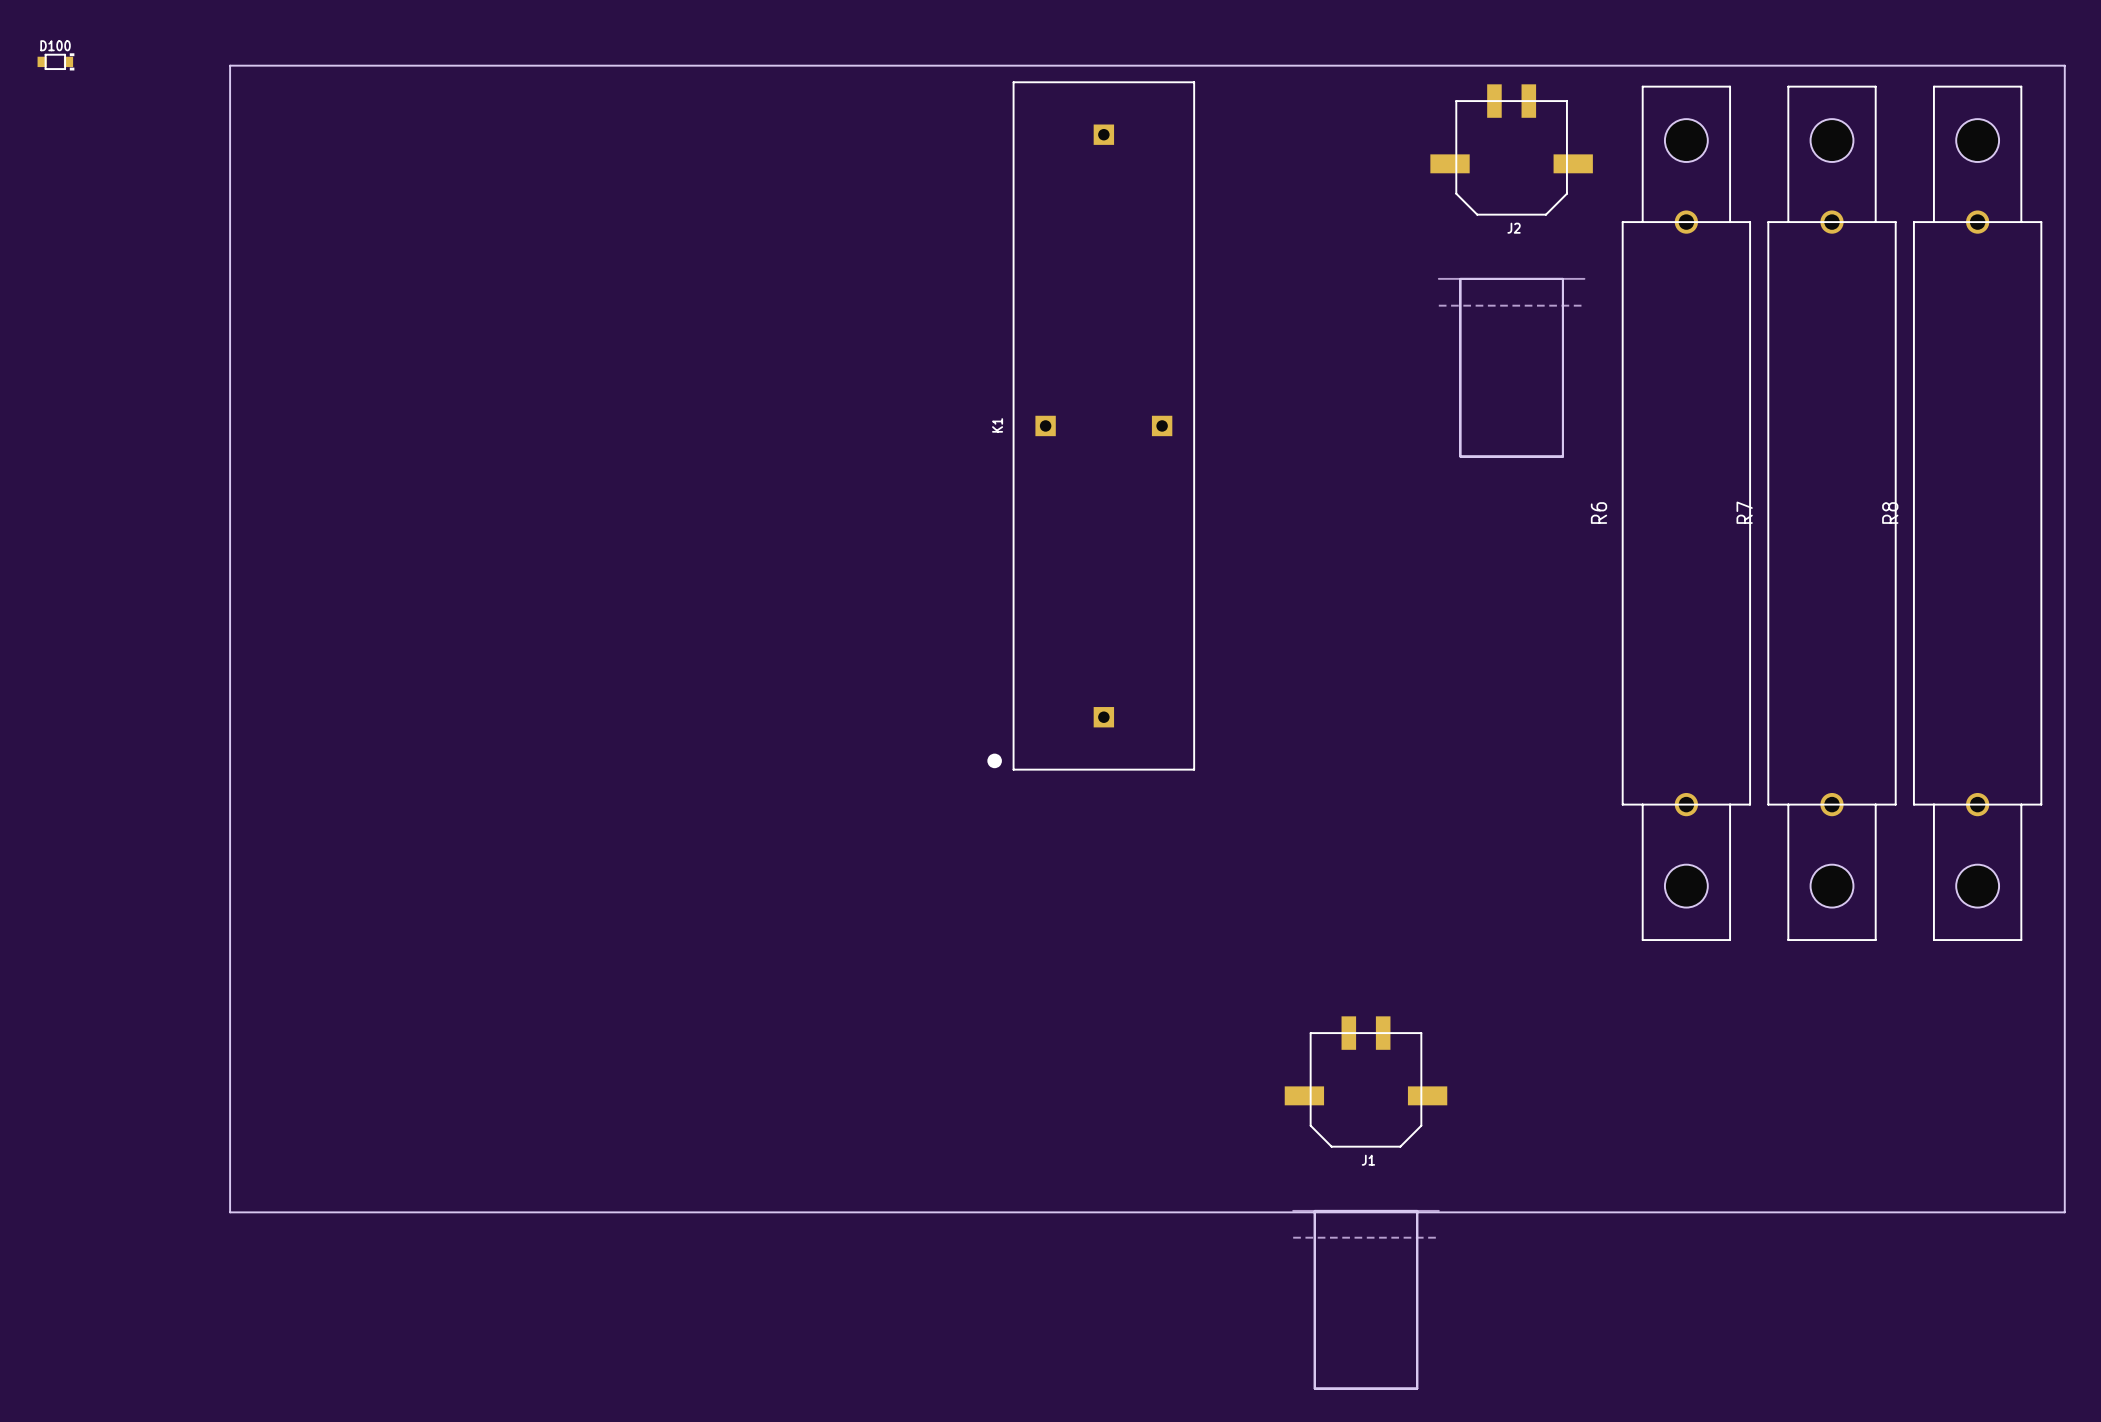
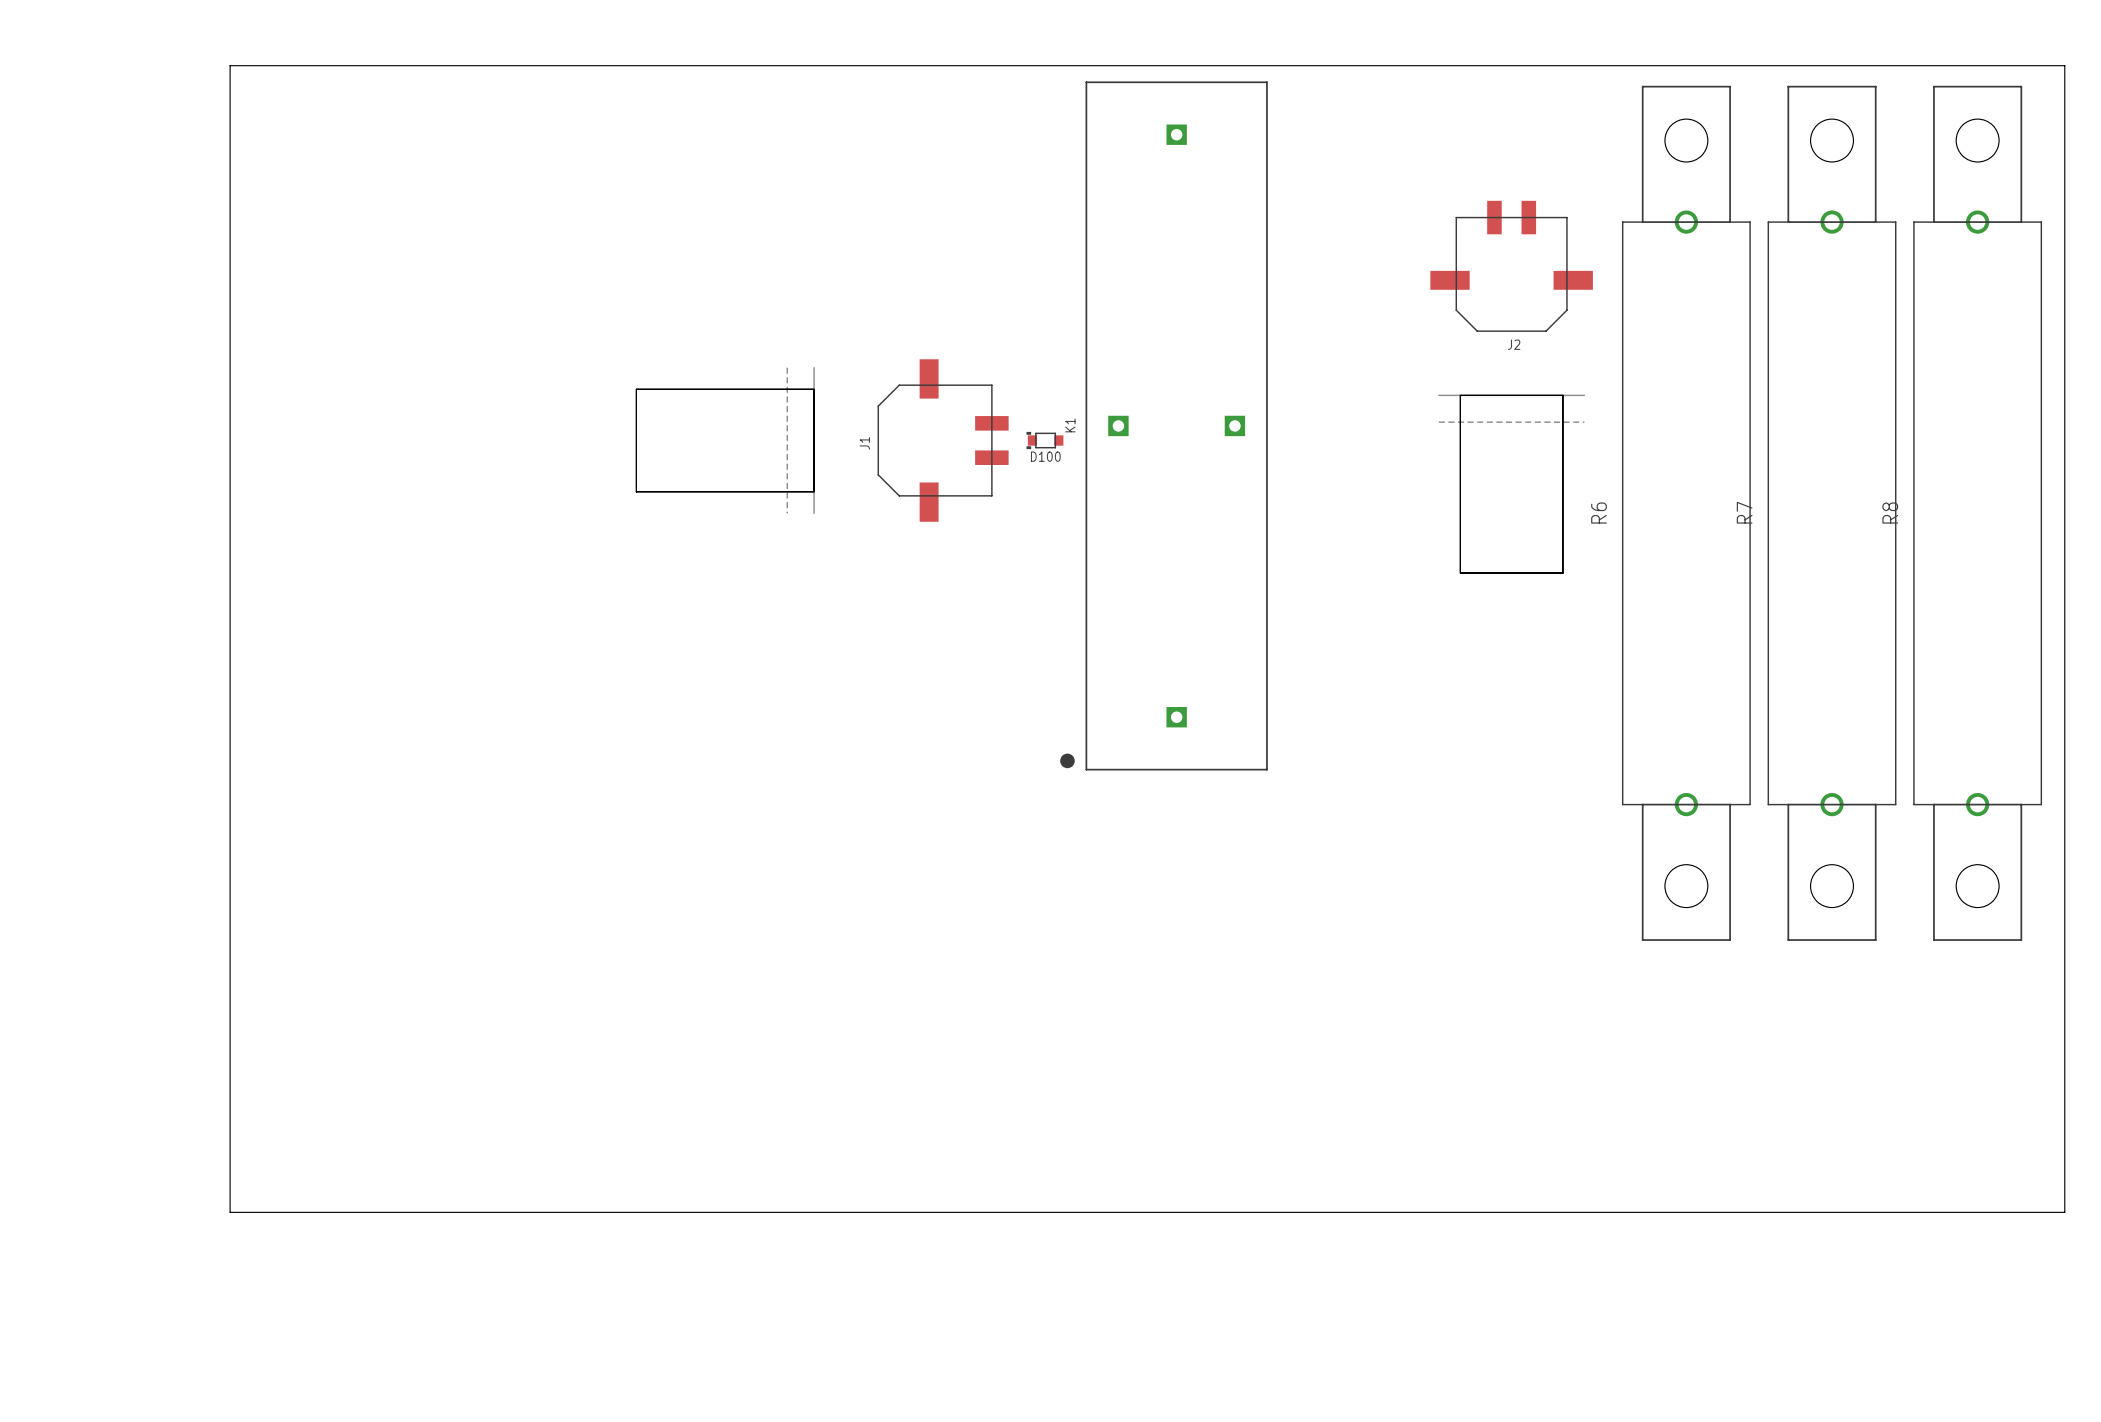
D100 rotation: 0° (55, 61) -> 180° (1044, 440)
D100 position: (55, 61) -> (1044, 440)
J2 position: (1511, 270) -> (1511, 386)
K1 position: (1091, 425) -> (1164, 425)
J1 rotation: 0° (1366, 1202) -> 90° clockwise (822, 440)
J1 position: (1366, 1202) -> (822, 440)

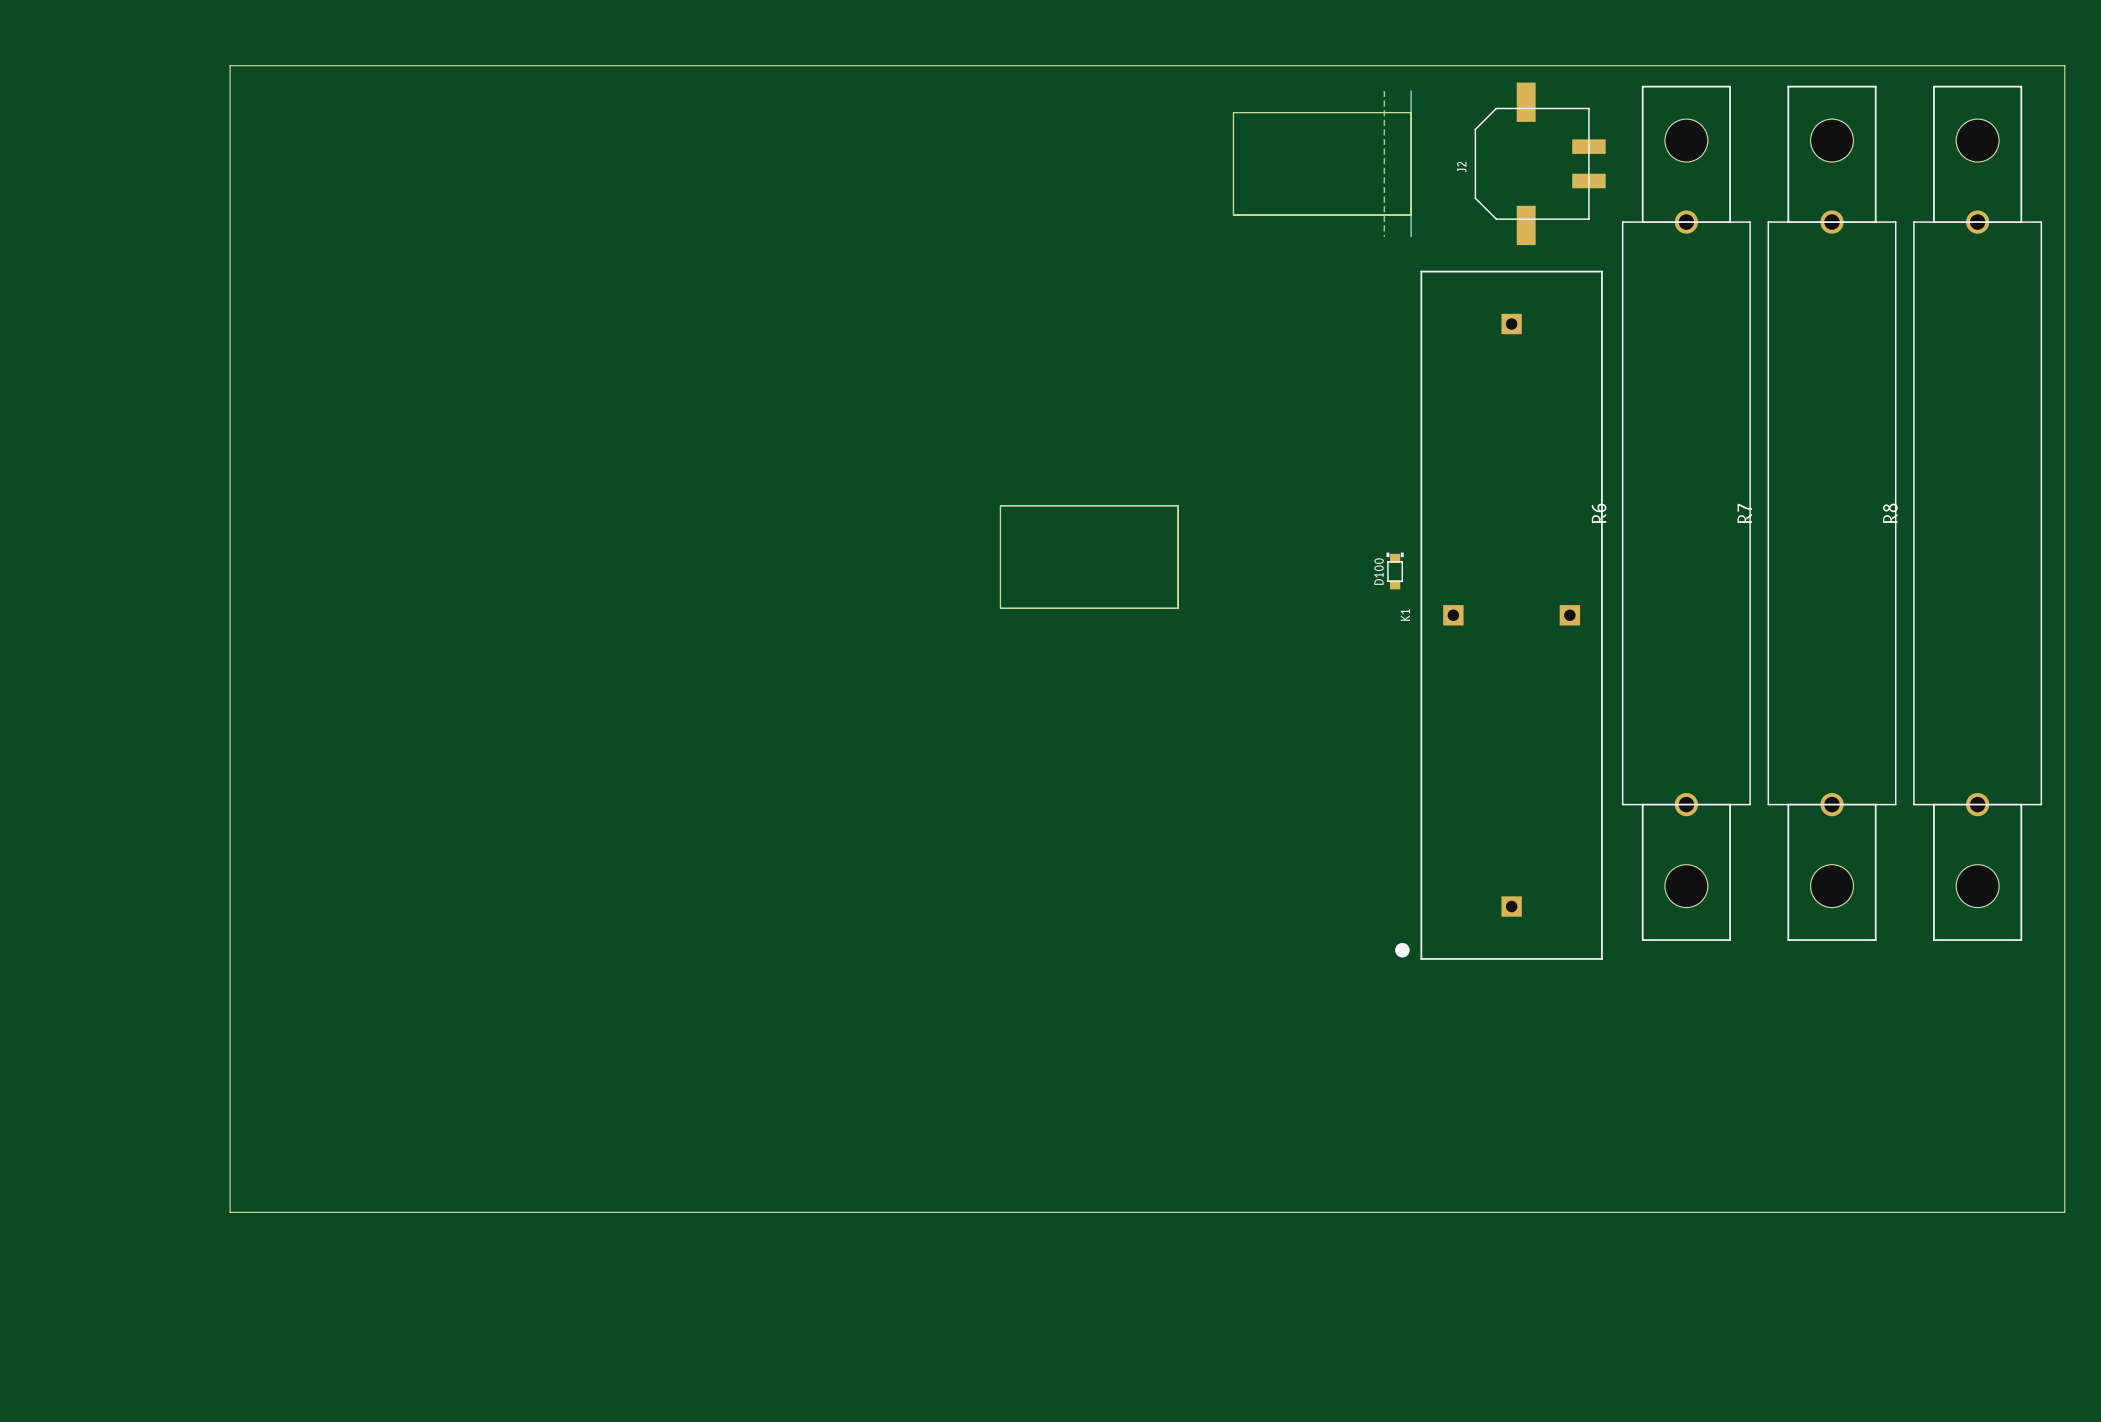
J2 rotation: 0° (1511, 386) -> 90° clockwise (1419, 163)
J2 position: (1511, 386) -> (1419, 163)
K1 position: (1164, 425) -> (1498, 615)
J1: (822, 440) -> none
D100 rotation: 0° (1044, 440) -> 90° clockwise (1395, 570)
D100 position: (1044, 440) -> (1395, 570)
part: none -> (1089, 557)

